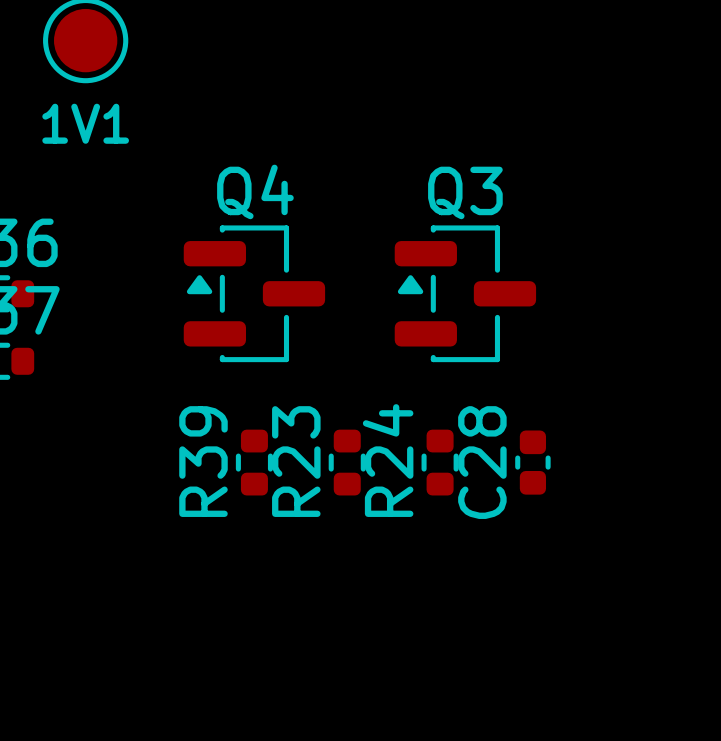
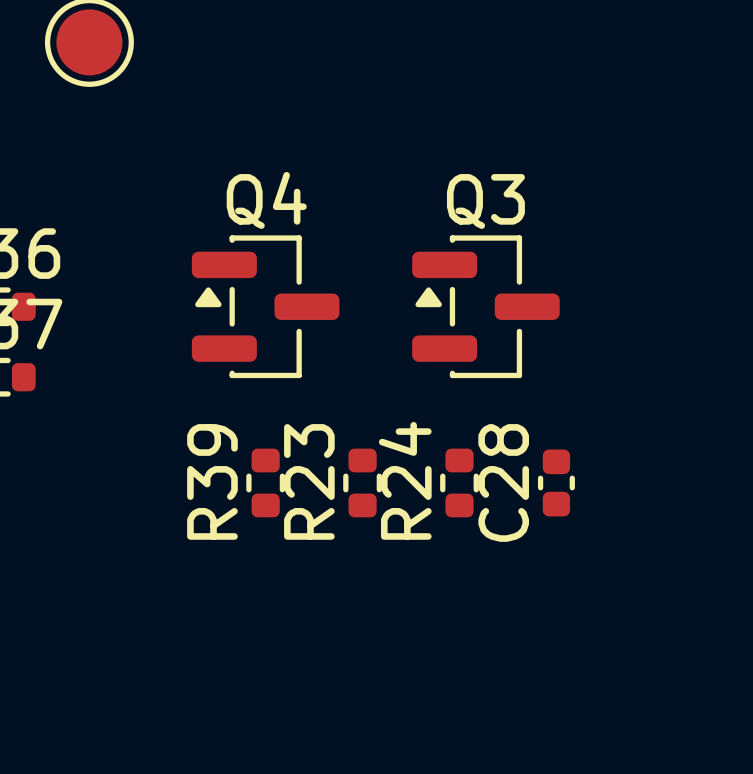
part value: 1V1 (85, 123) -> none

